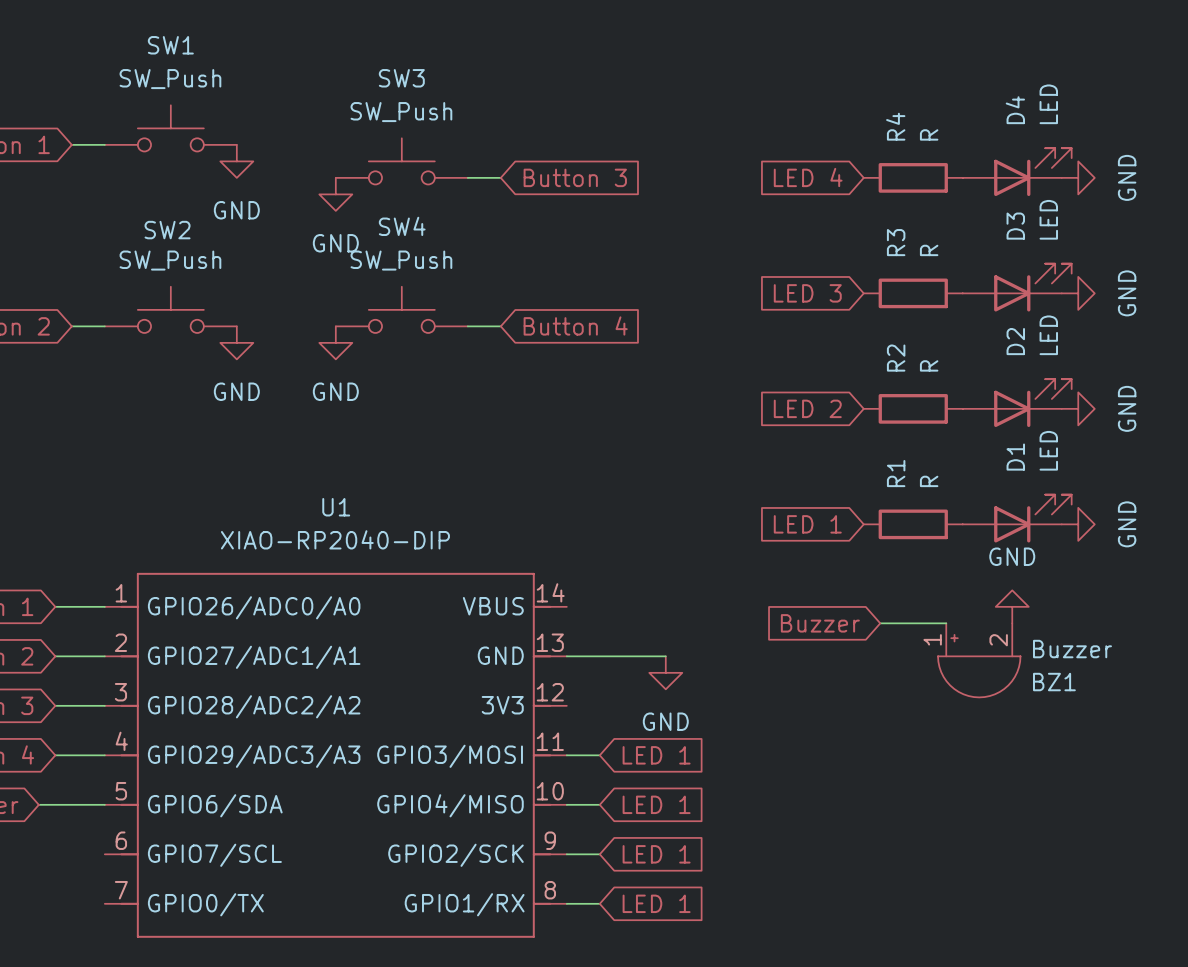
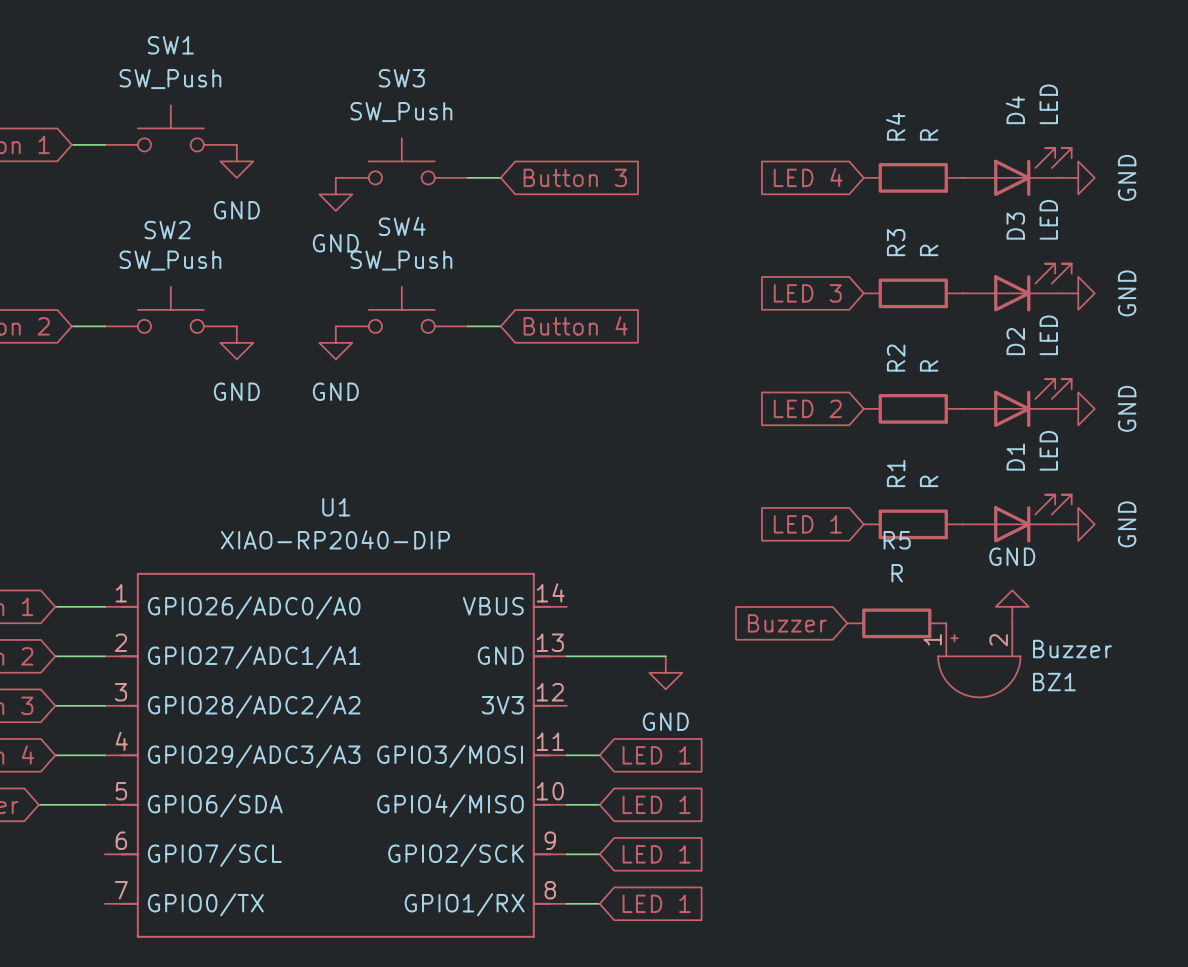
global label position: Buzzer (820, 623) -> Buzzer (787, 623)
wire: (880, 623) (946, 623) -> none
R5: none -> R (896, 623)

